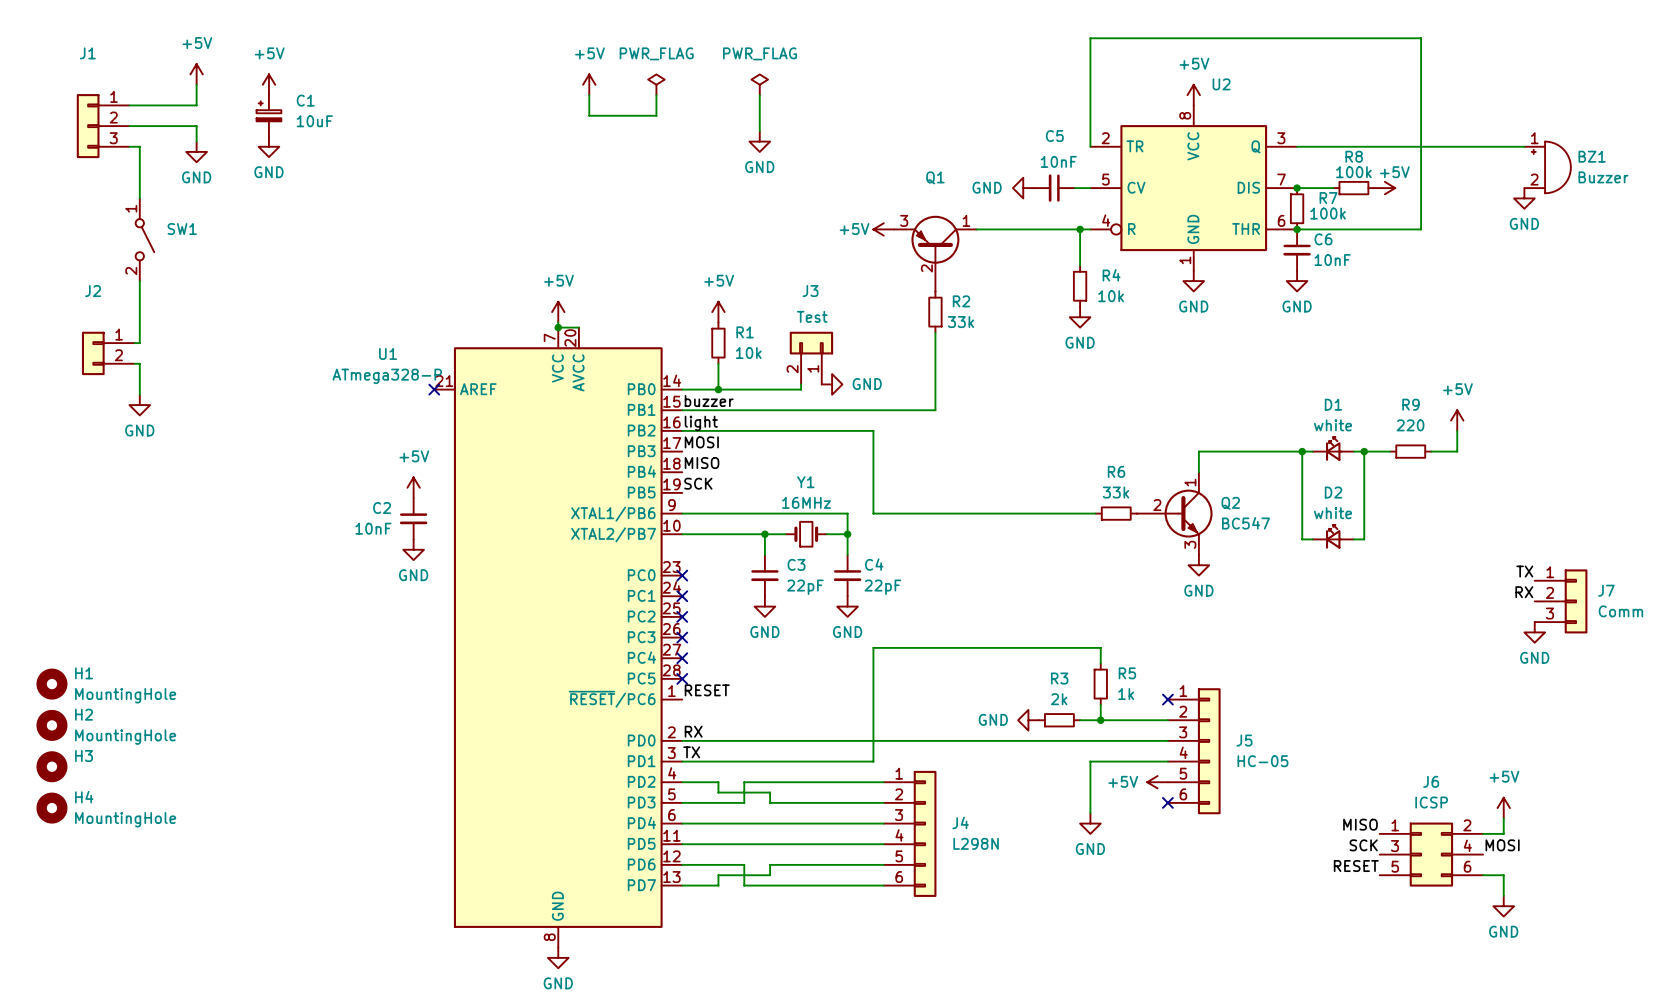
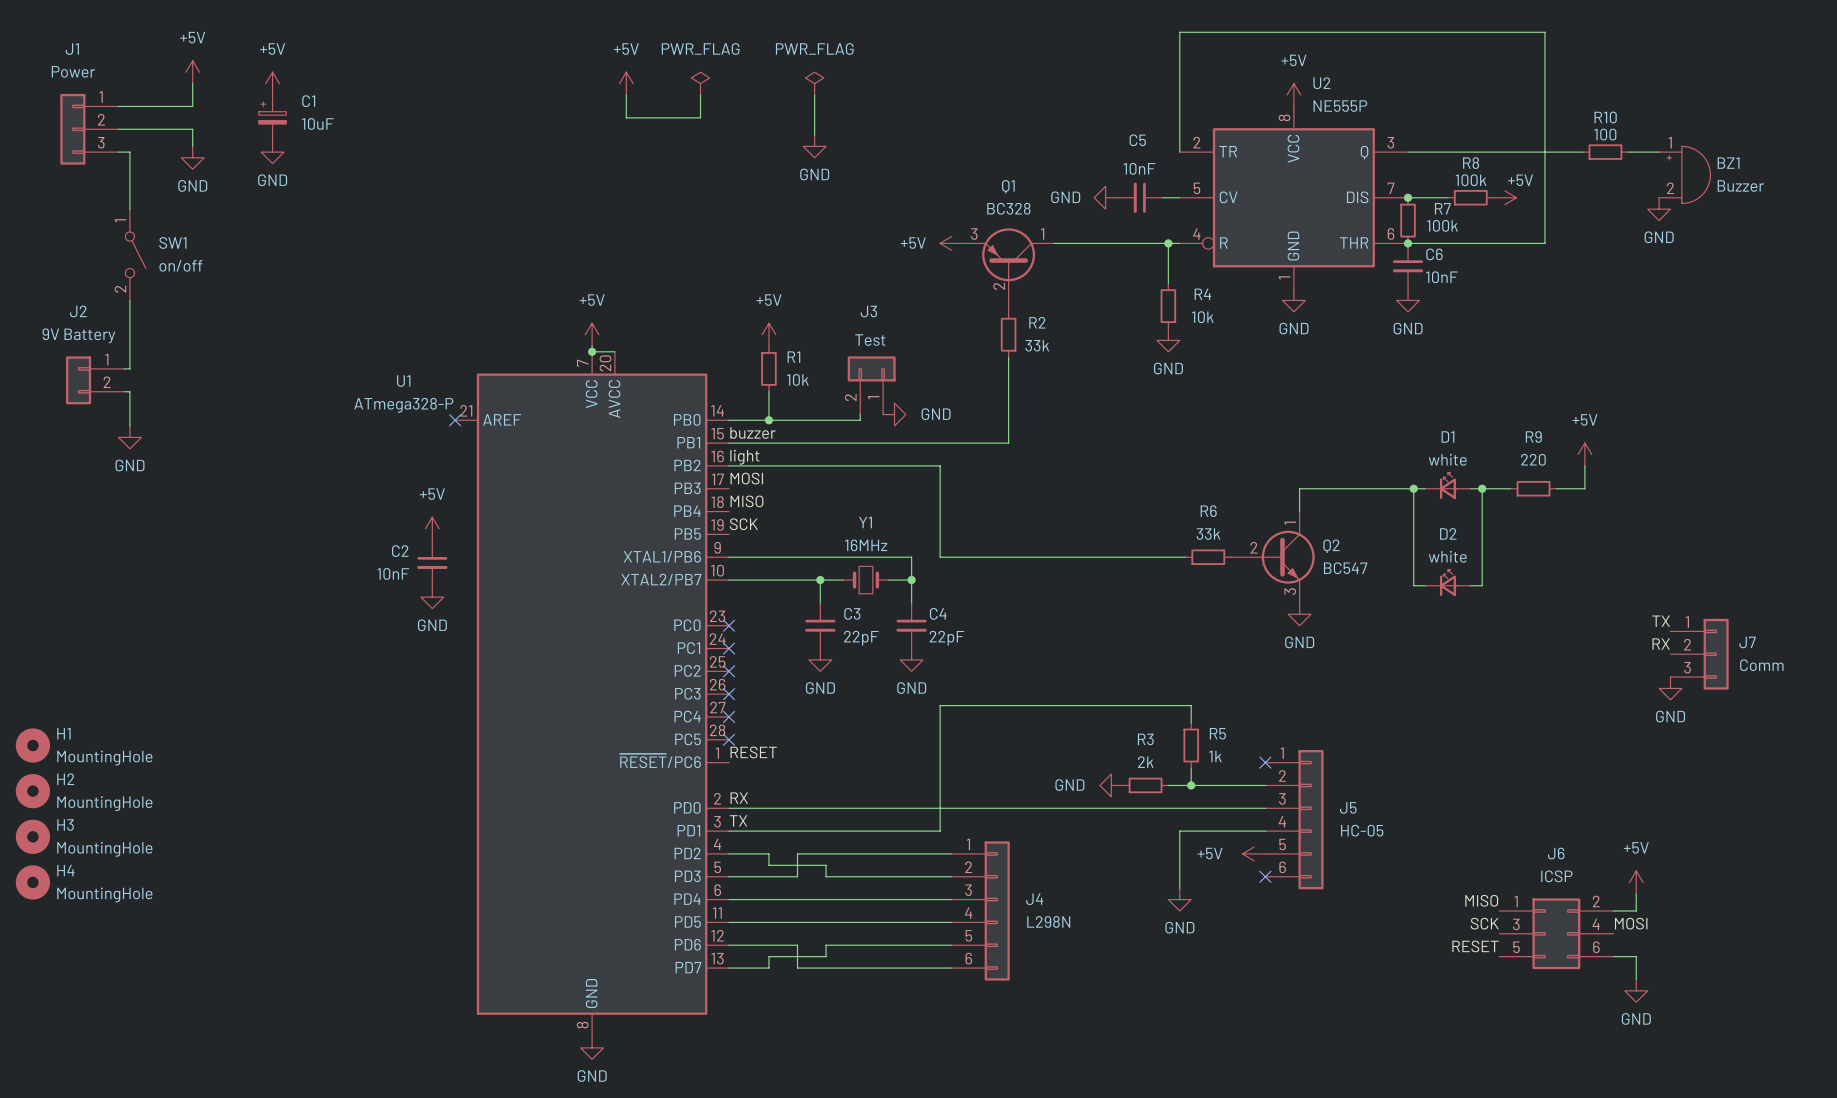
J1 value: none -> Power (73, 71)
U2 value: none -> NE555P (1340, 106)
wire: (1455, 146) (1496, 146) -> none
R10: none -> 100 (1605, 152)
Q1 value: none -> BC328 (1008, 208)
SW1 value: none -> on/off (180, 265)
J2 value: none -> 9V Battery (78, 335)
H3 value: none -> MountingHole (104, 849)

